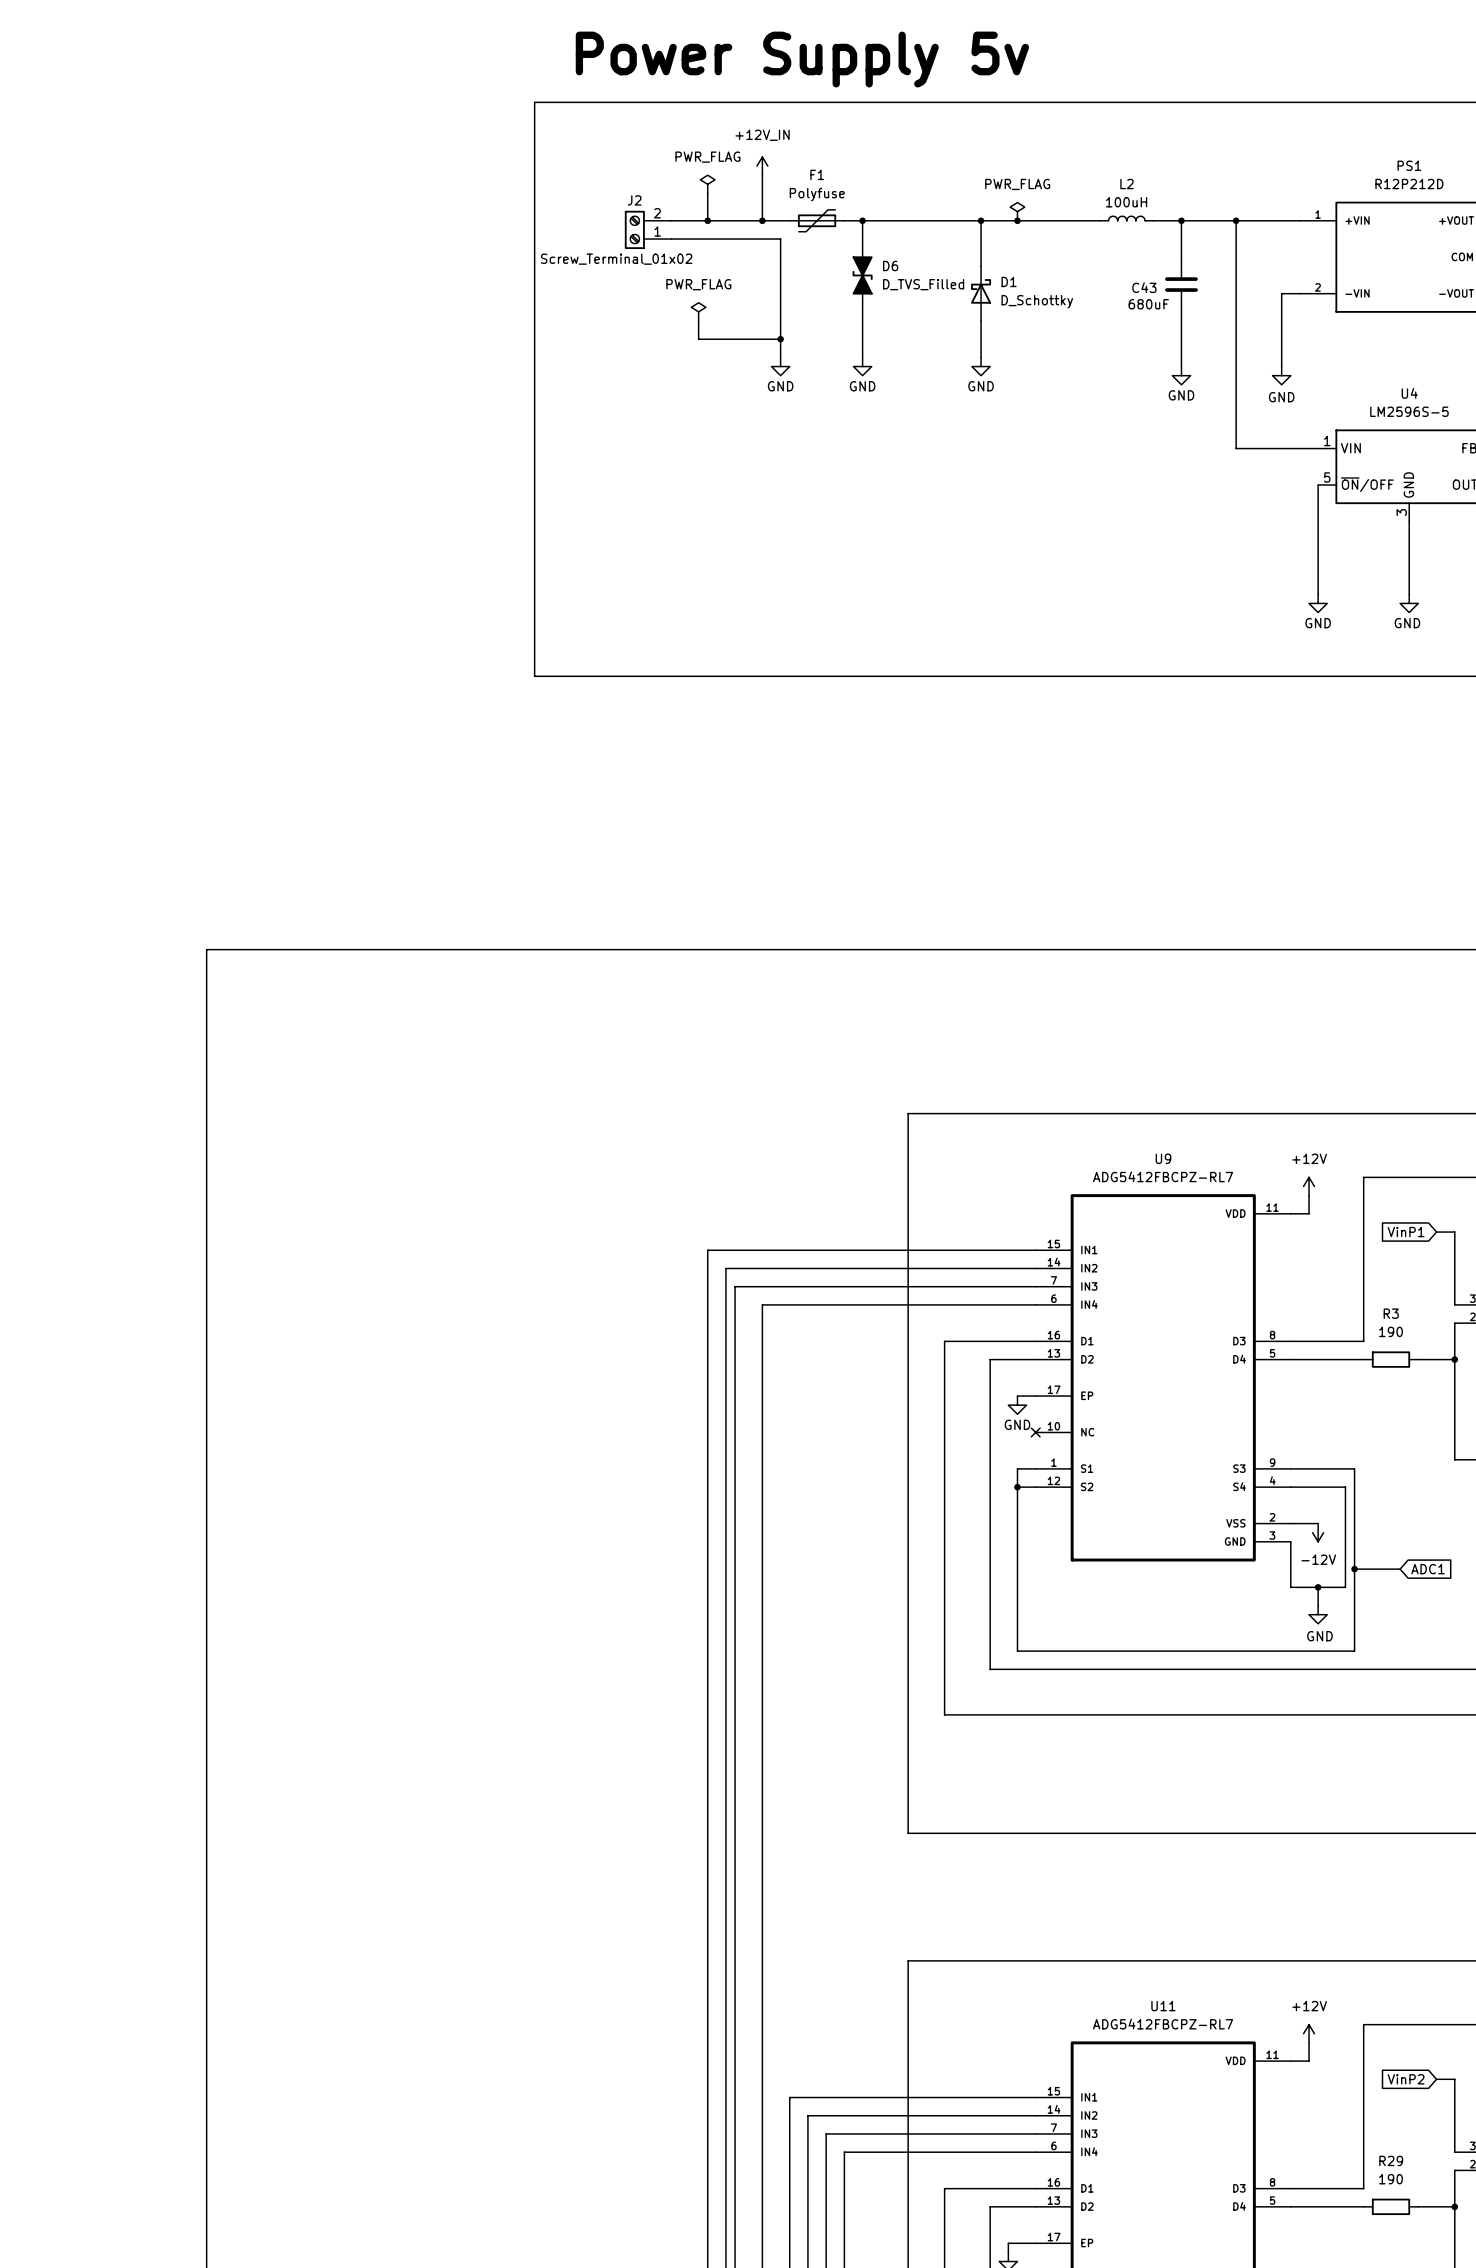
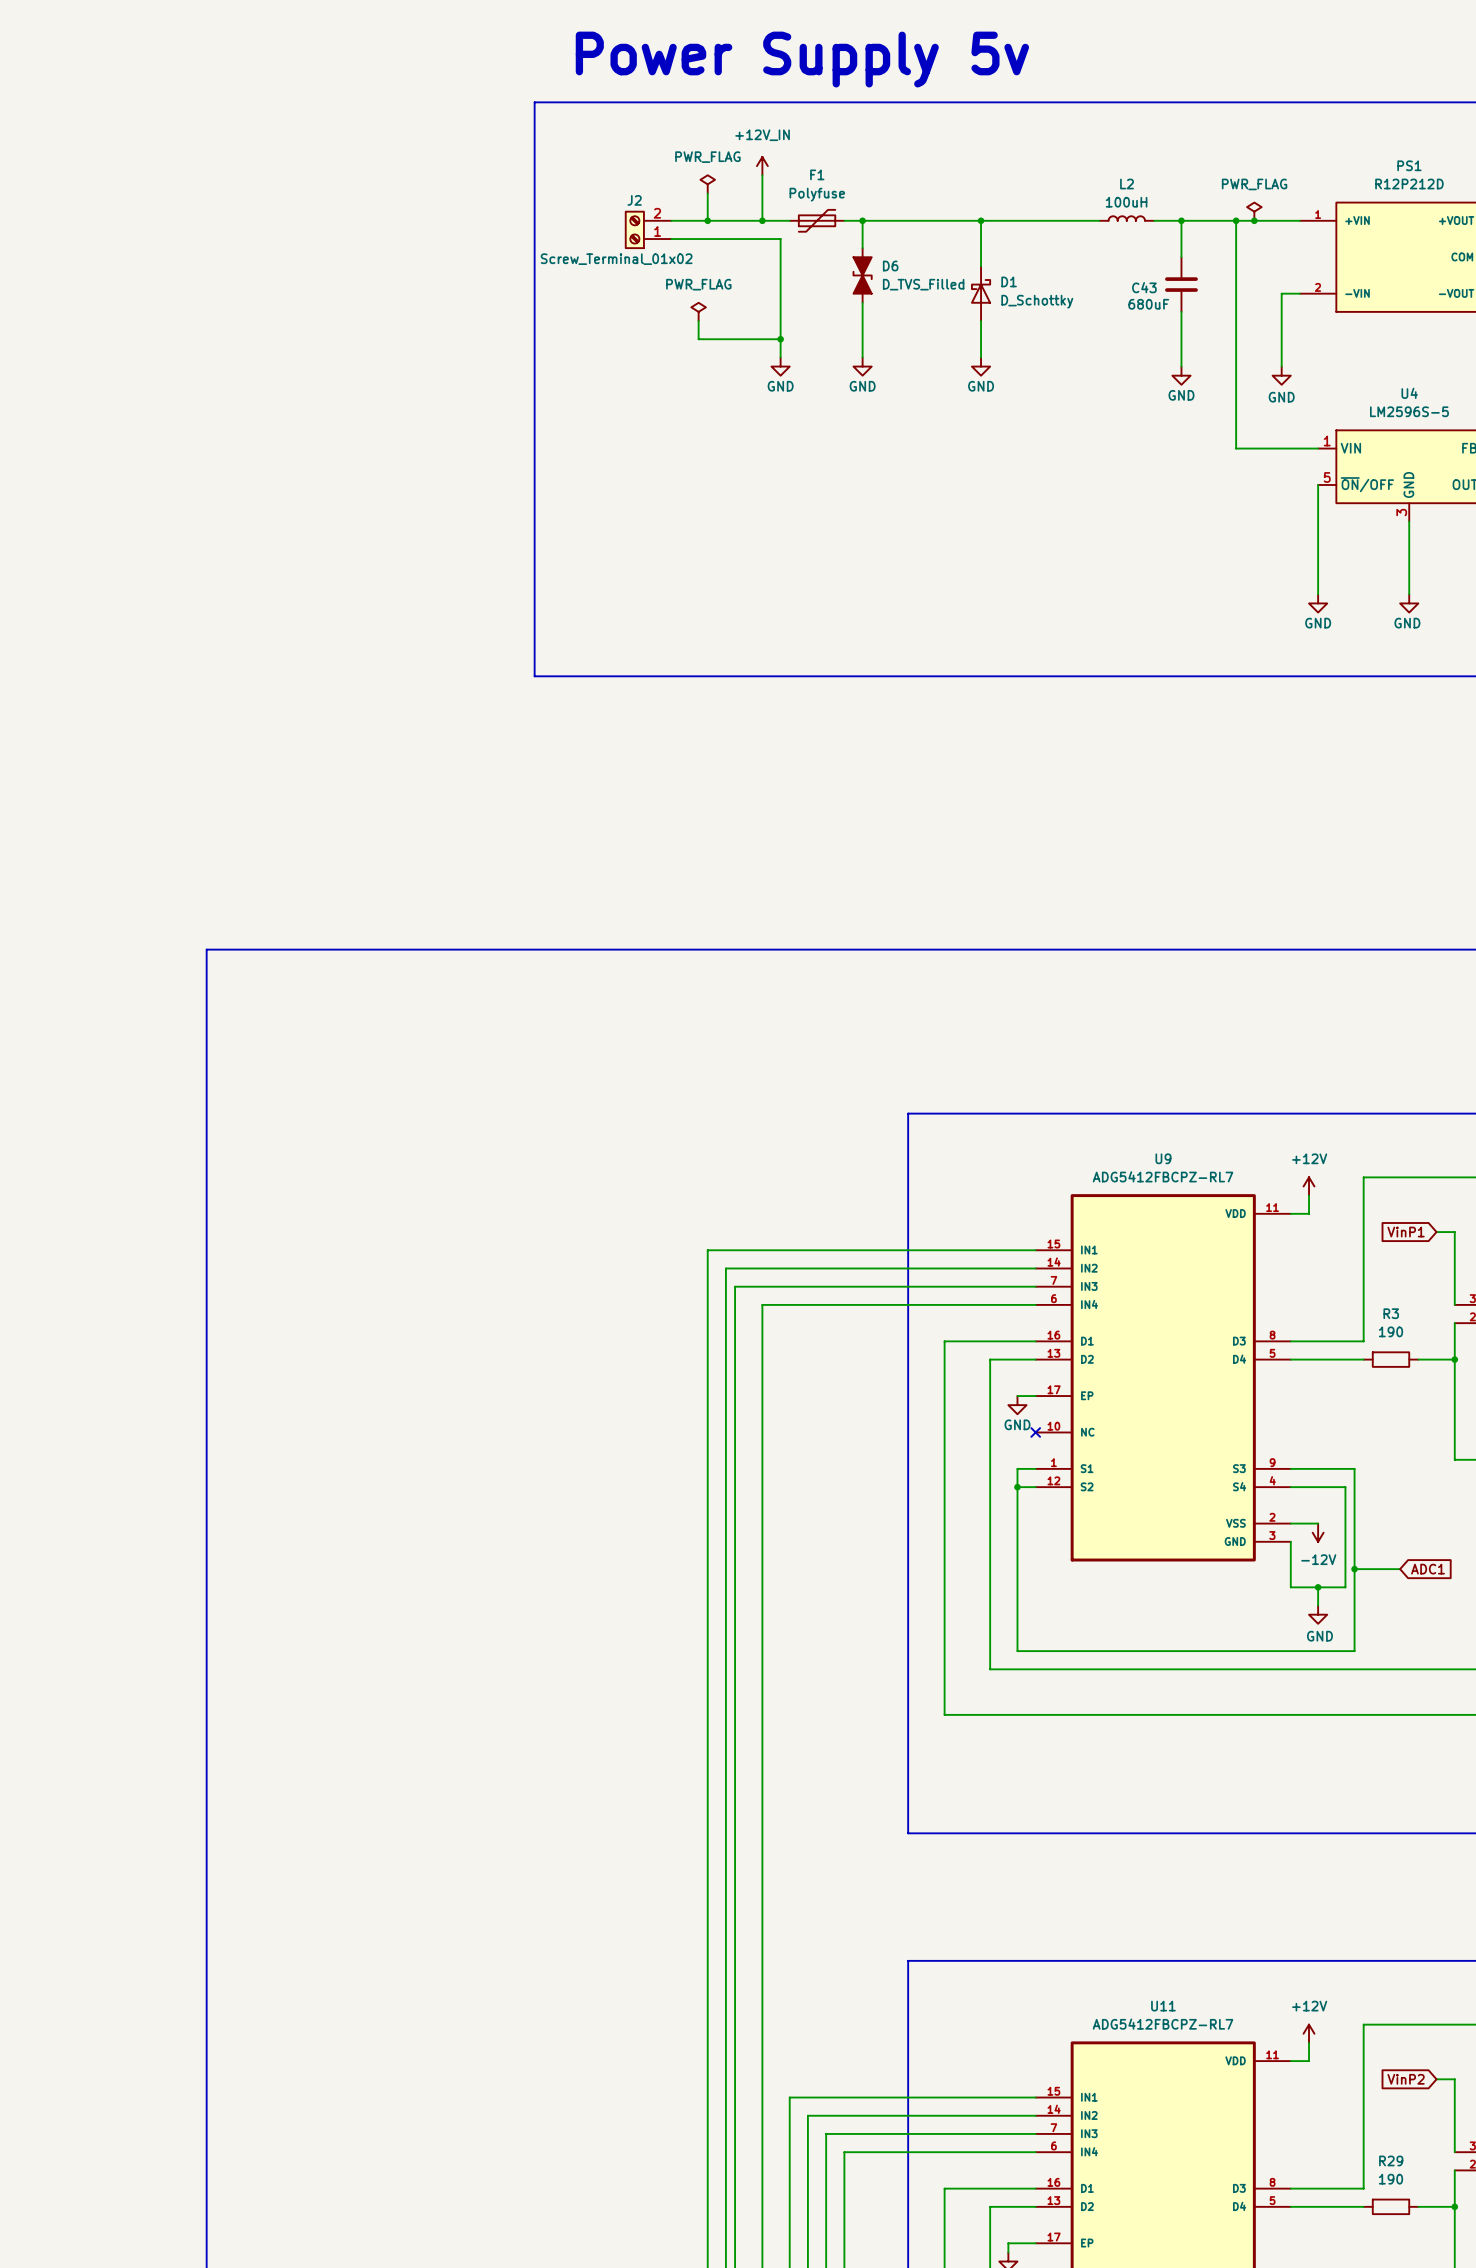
power symbol: PWR_FLAG (1017, 211) -> none
power symbol: none -> PWR_FLAG (1254, 211)
junction: (1017, 220) -> none
junction: none -> (1254, 220)

